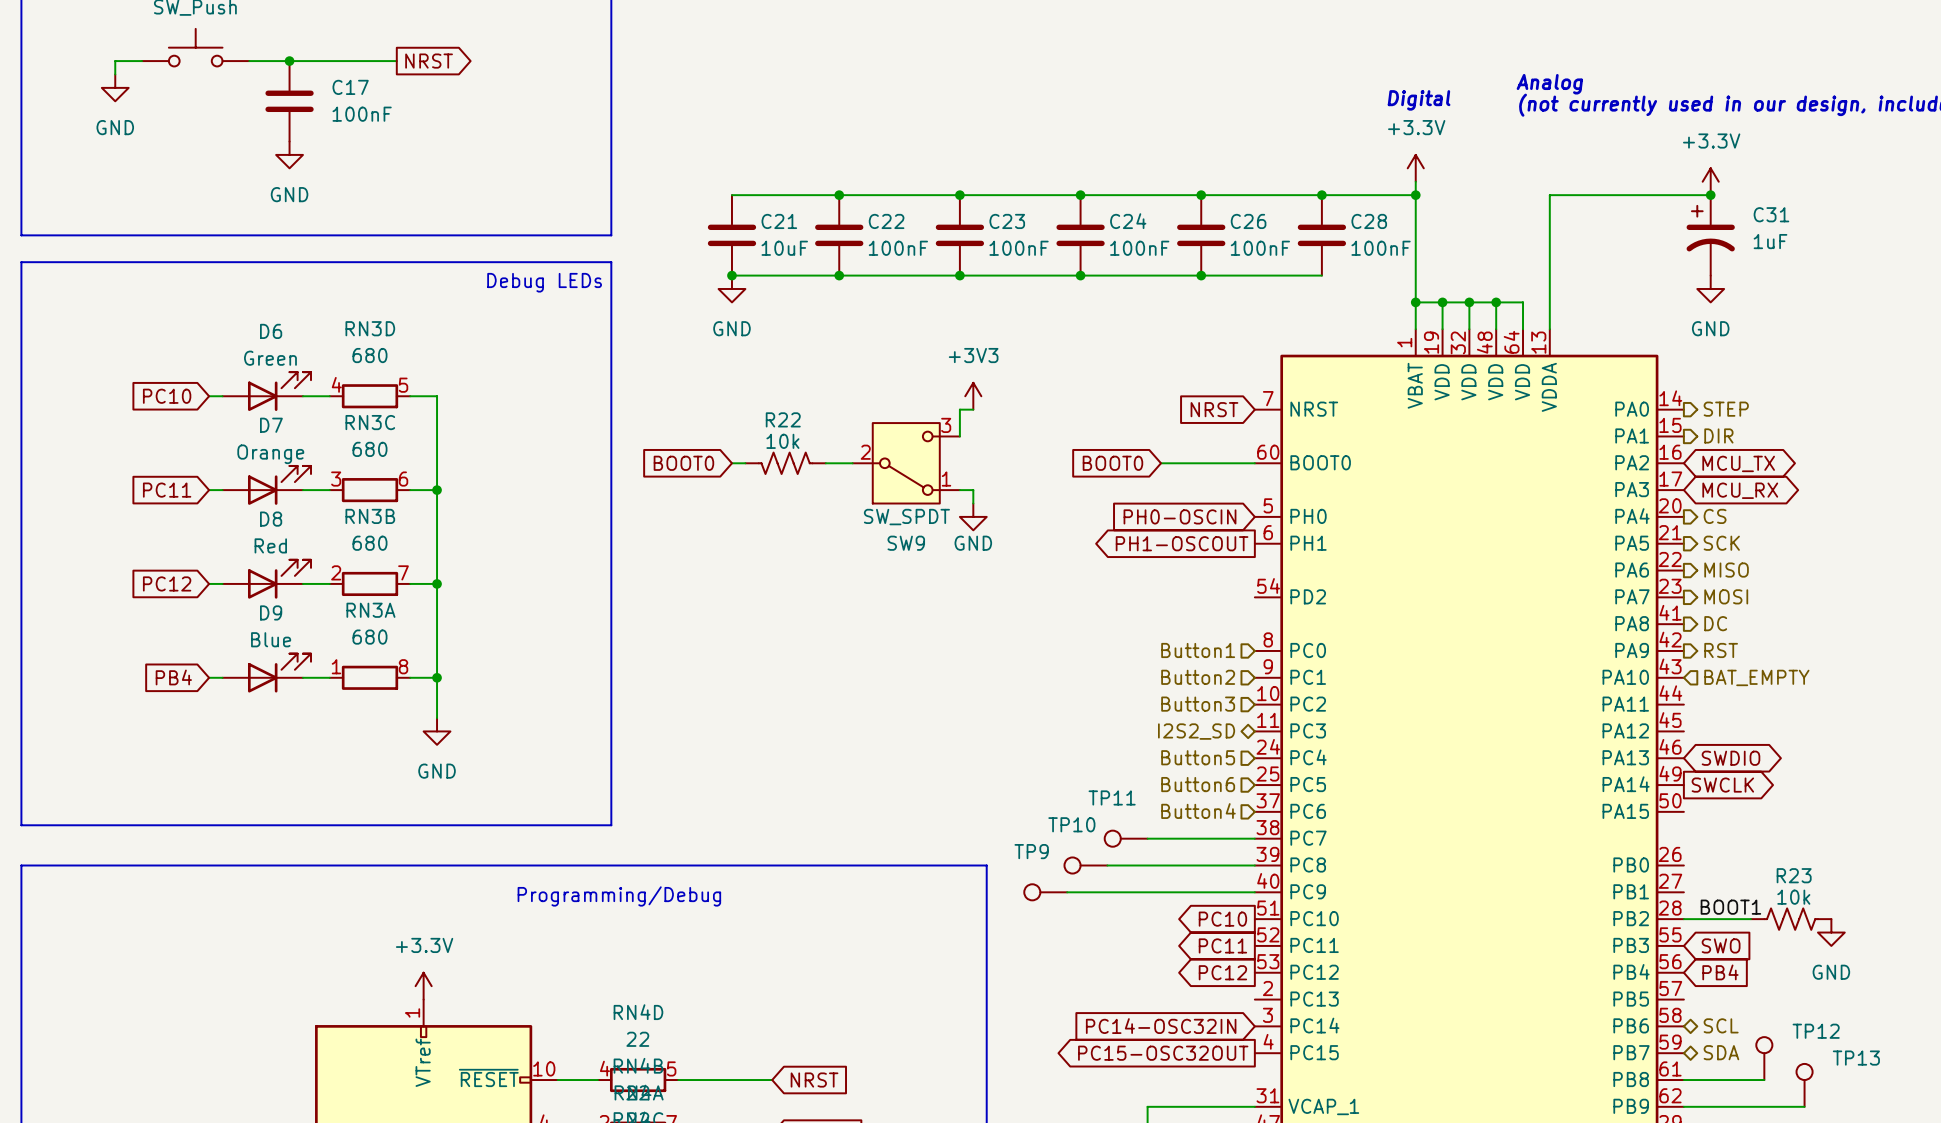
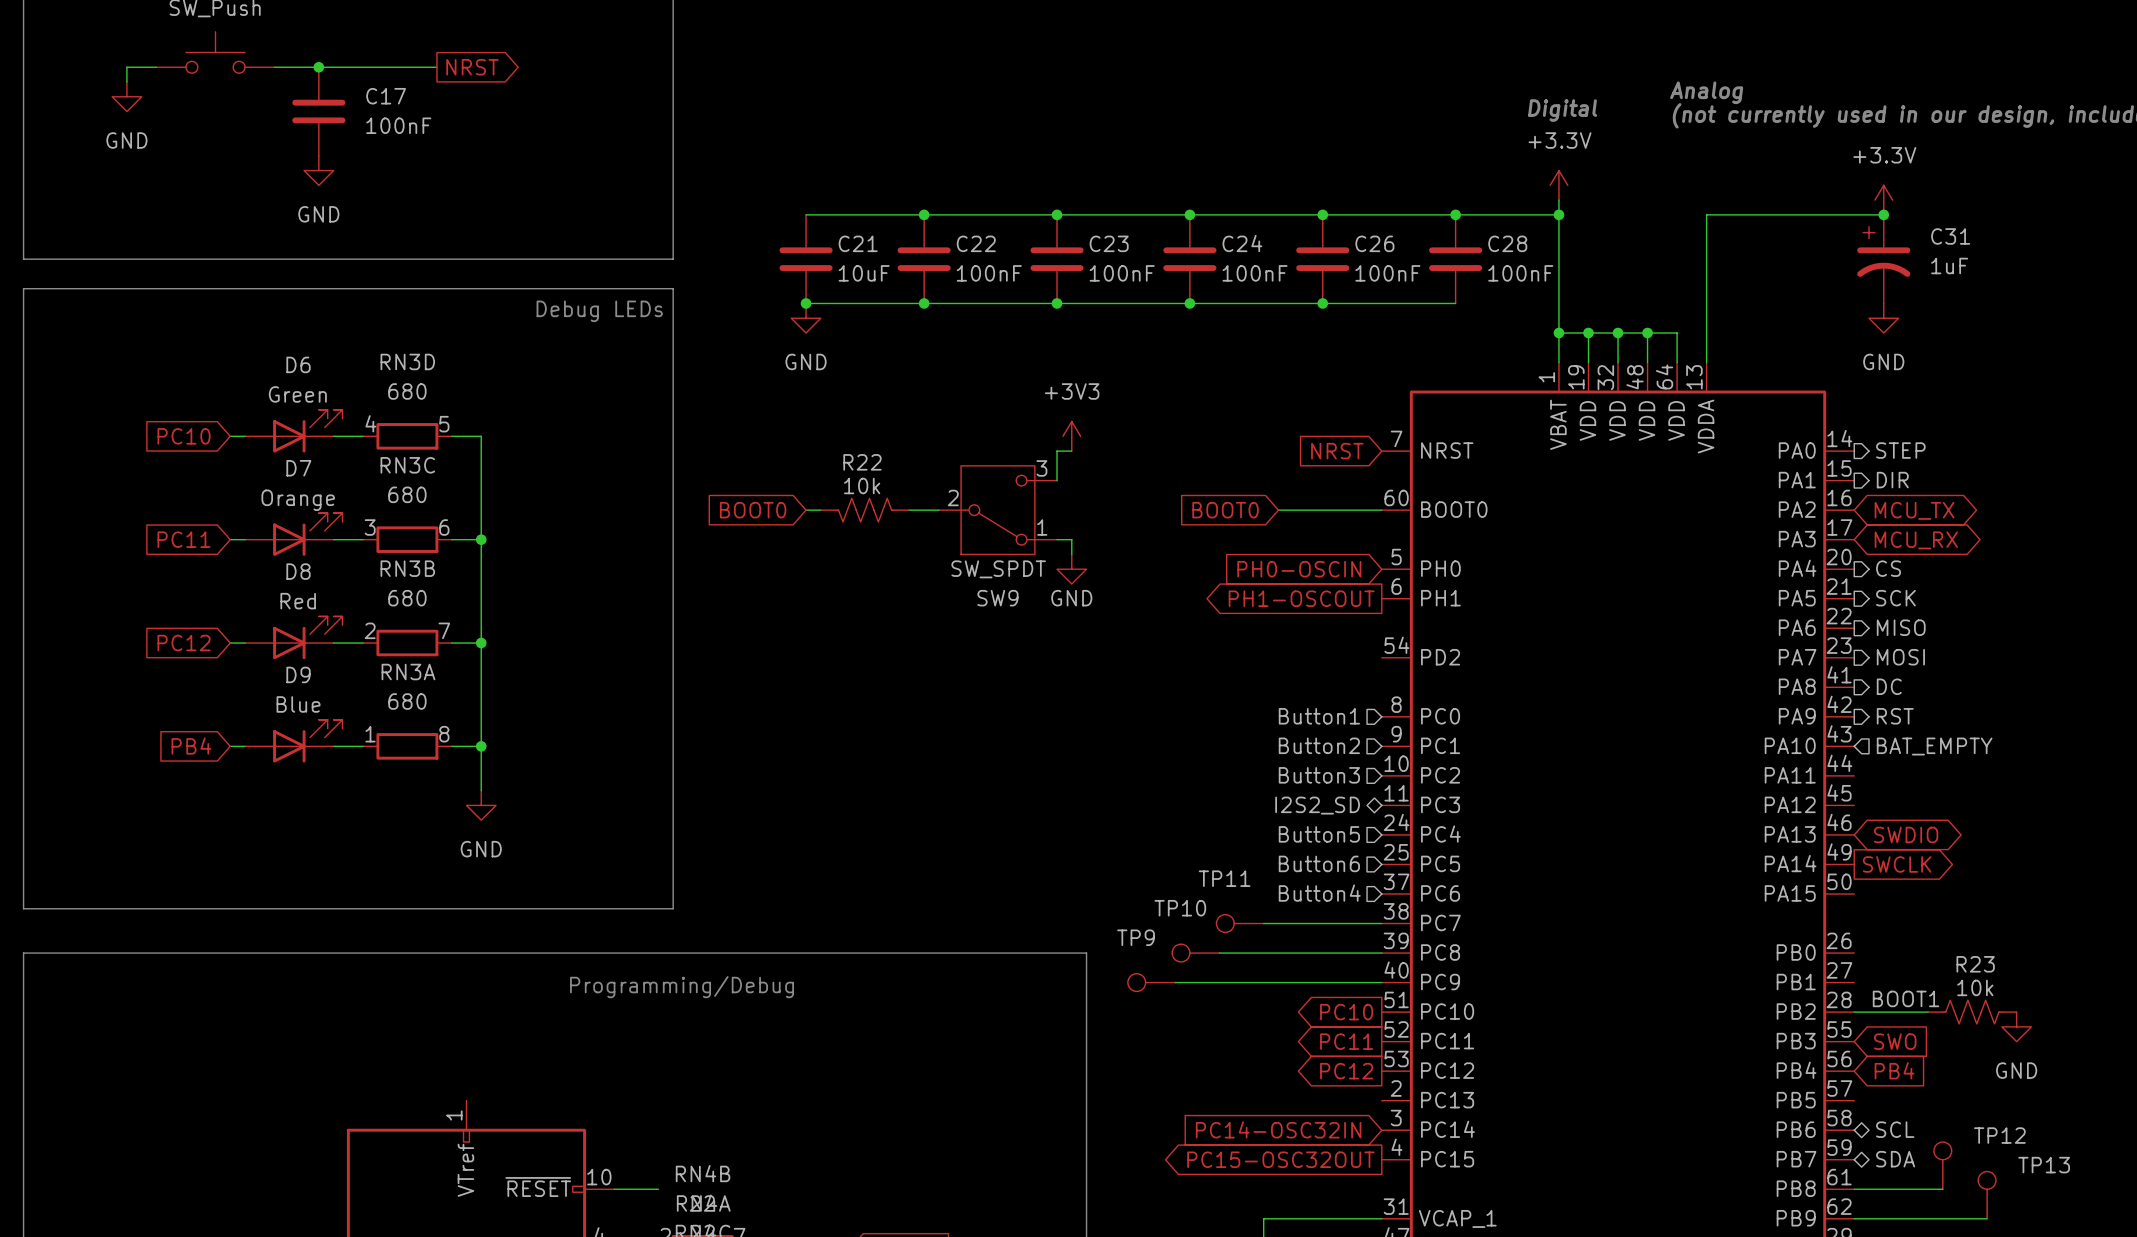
power symbol: +3.3V (423, 986) -> none
RN4D: 22 (638, 1080) -> none
wire: (678, 1080) (772, 1080) -> none
global label: NRST (814, 1080) -> none

